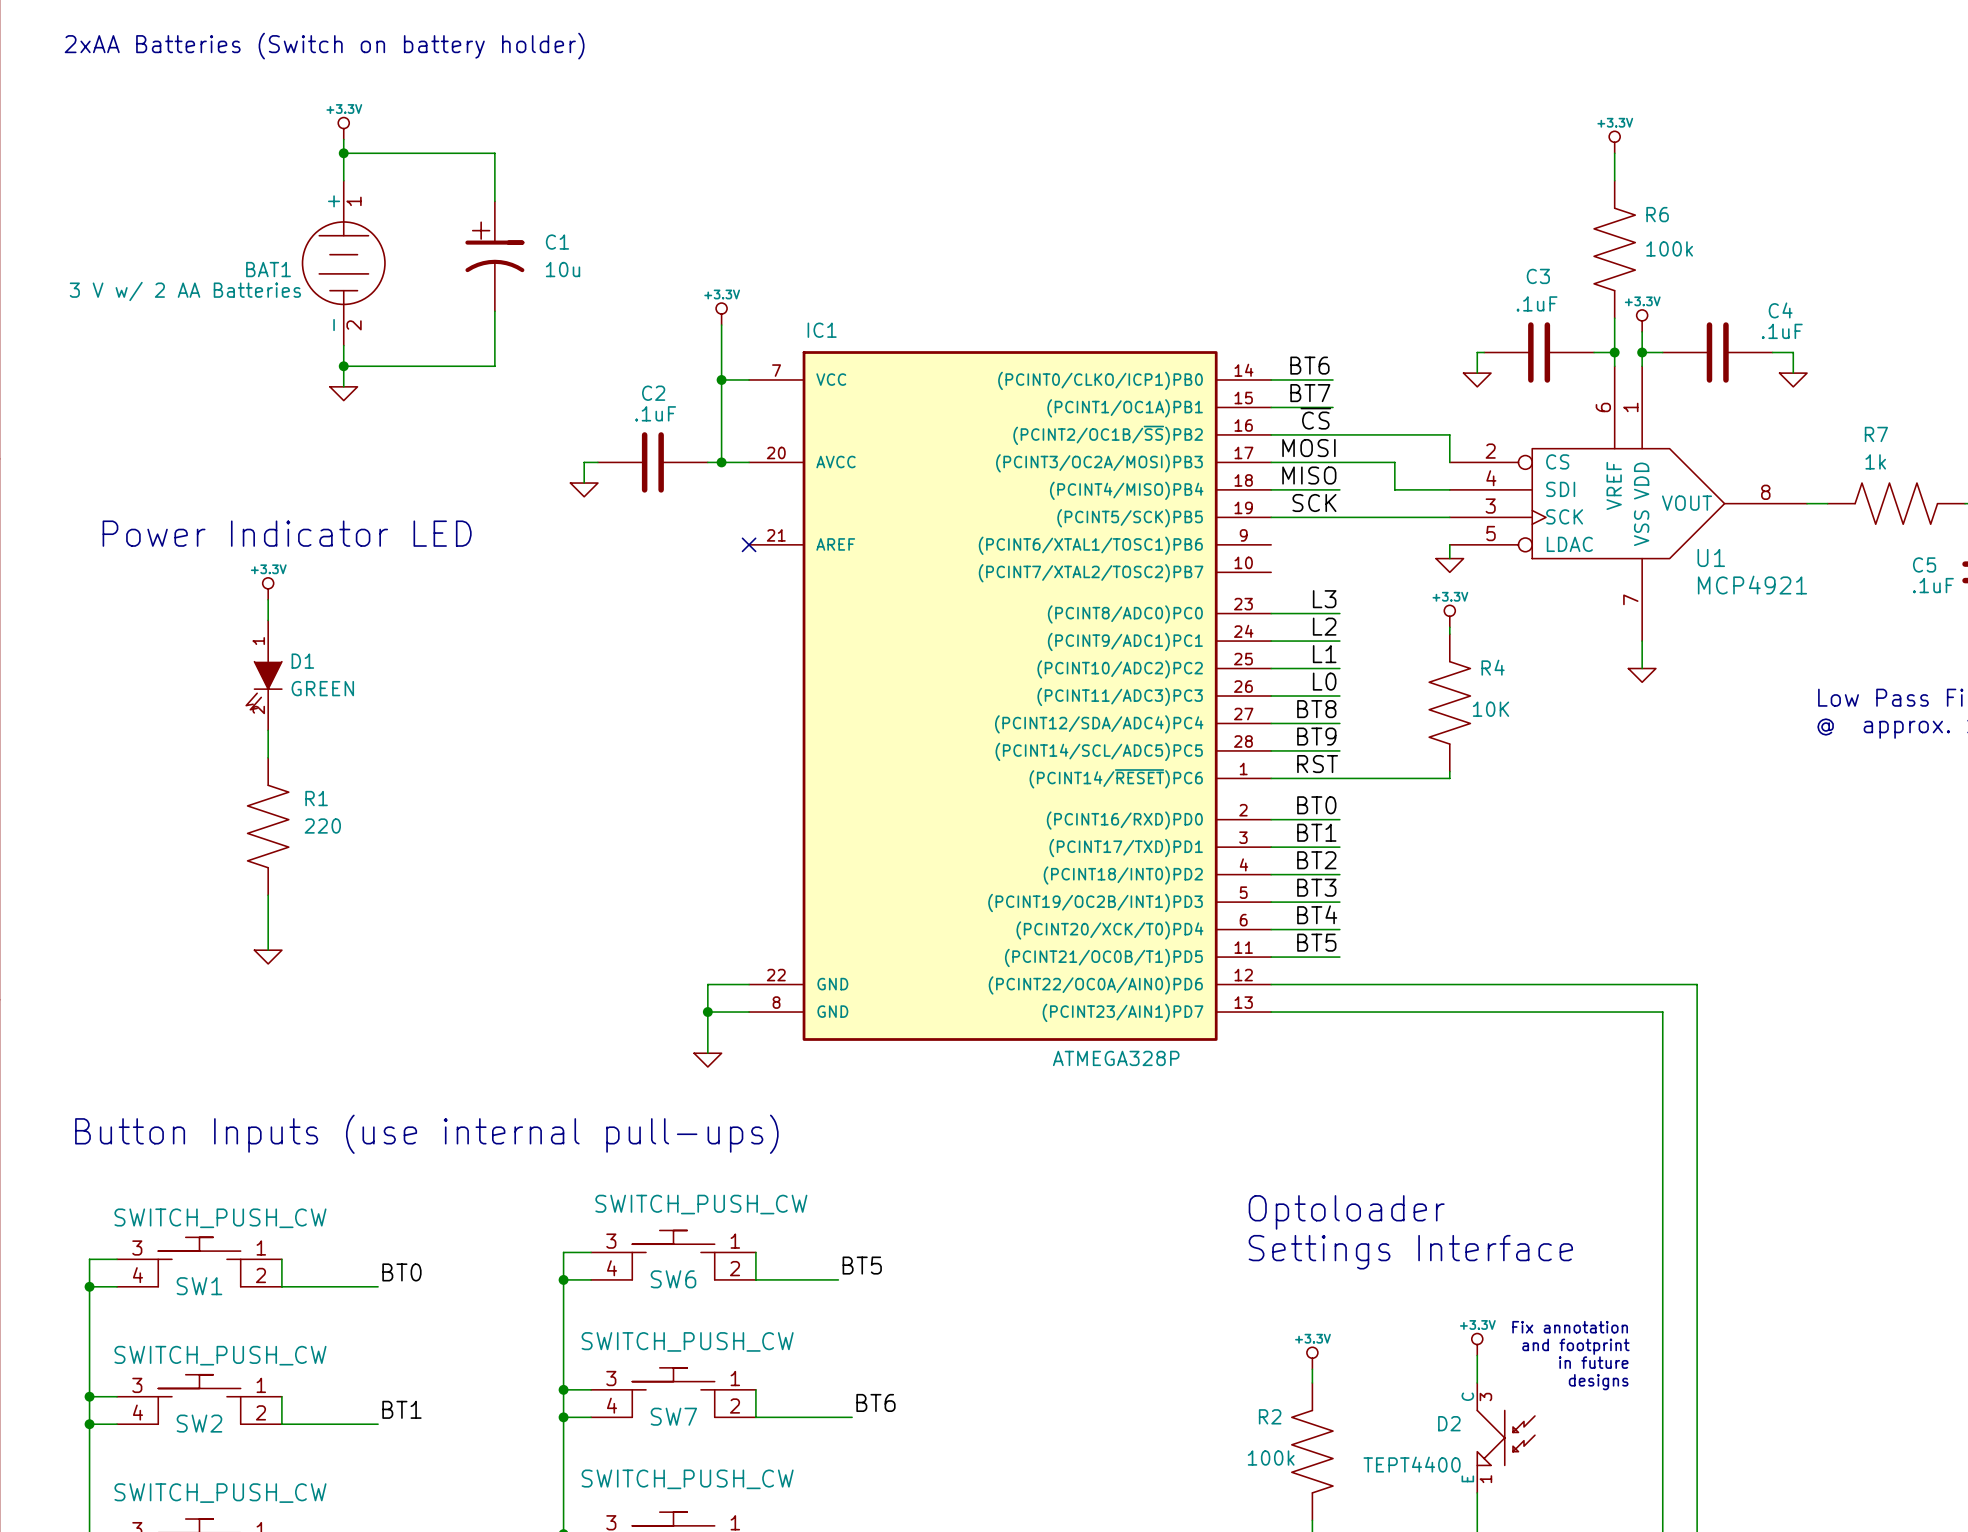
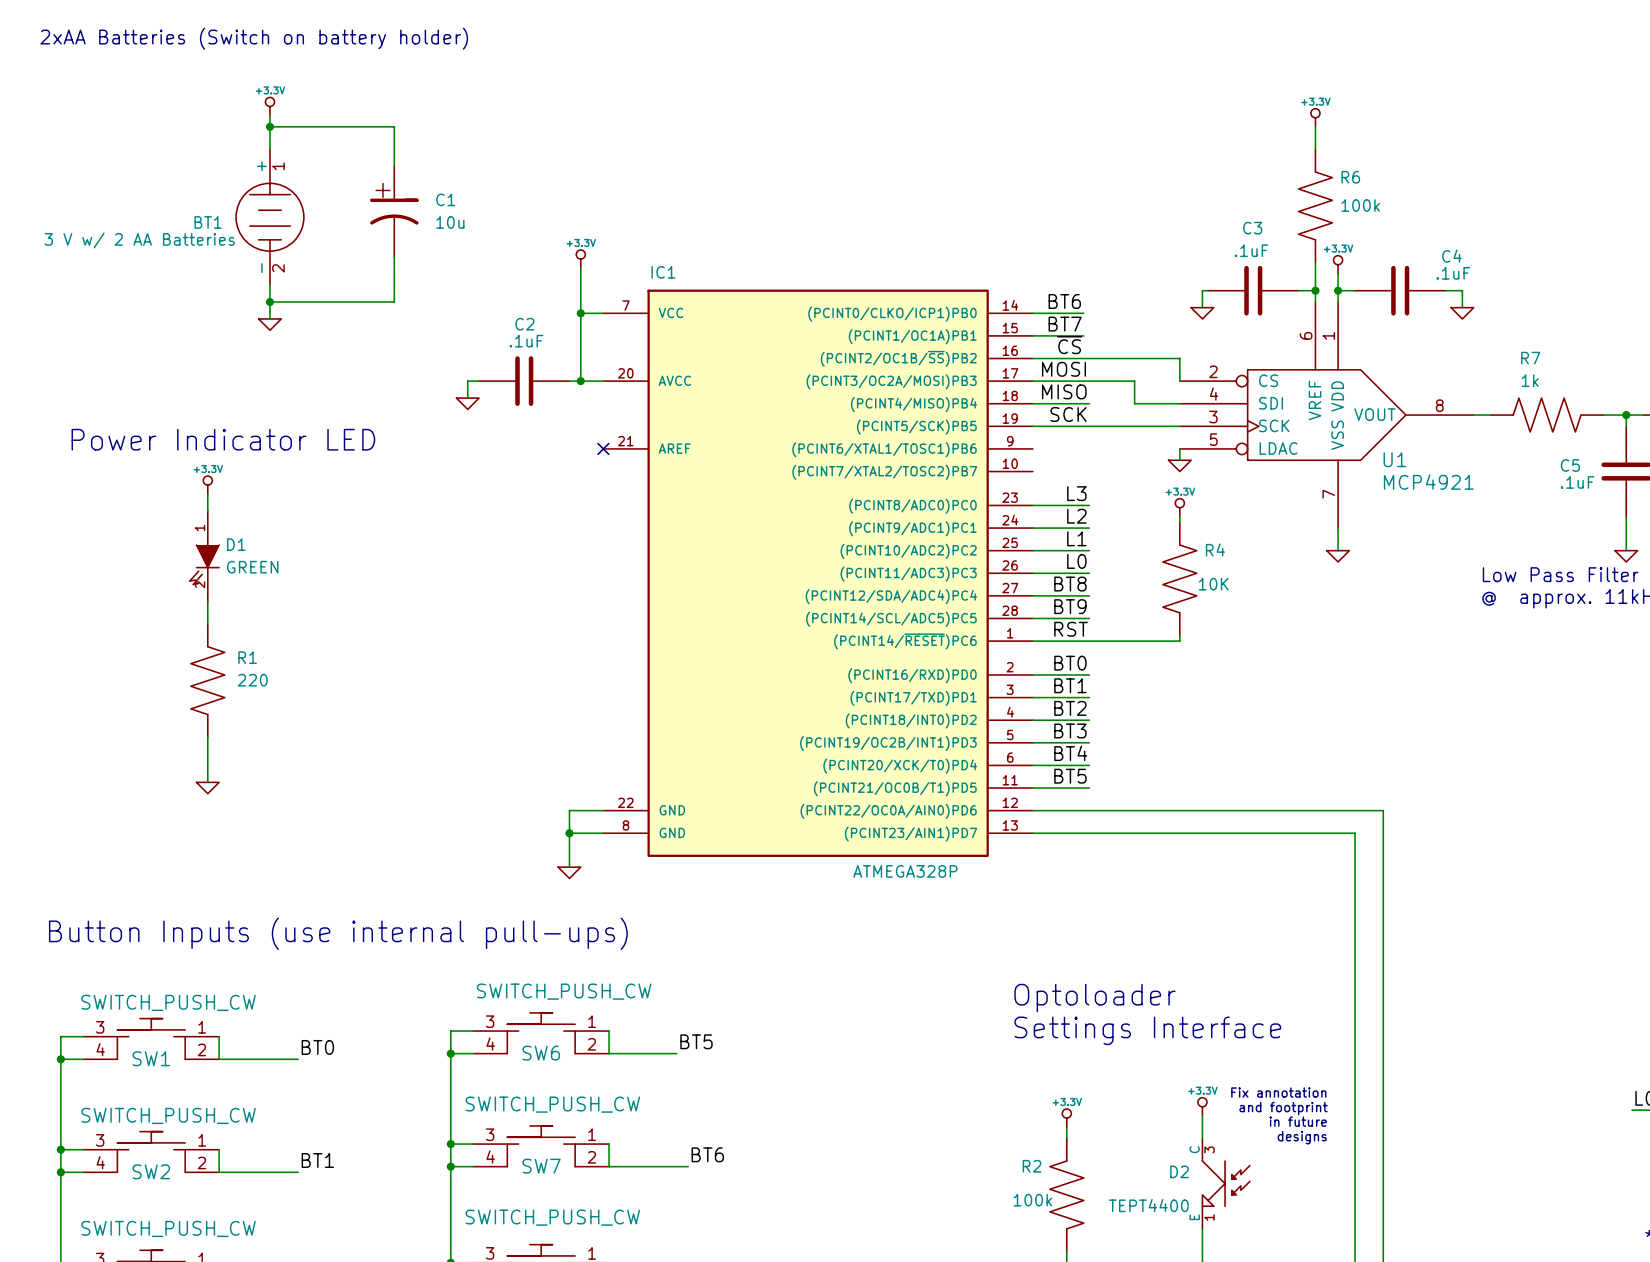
BAT1 name: BAT1 (268, 269) -> BT1 (208, 222)

